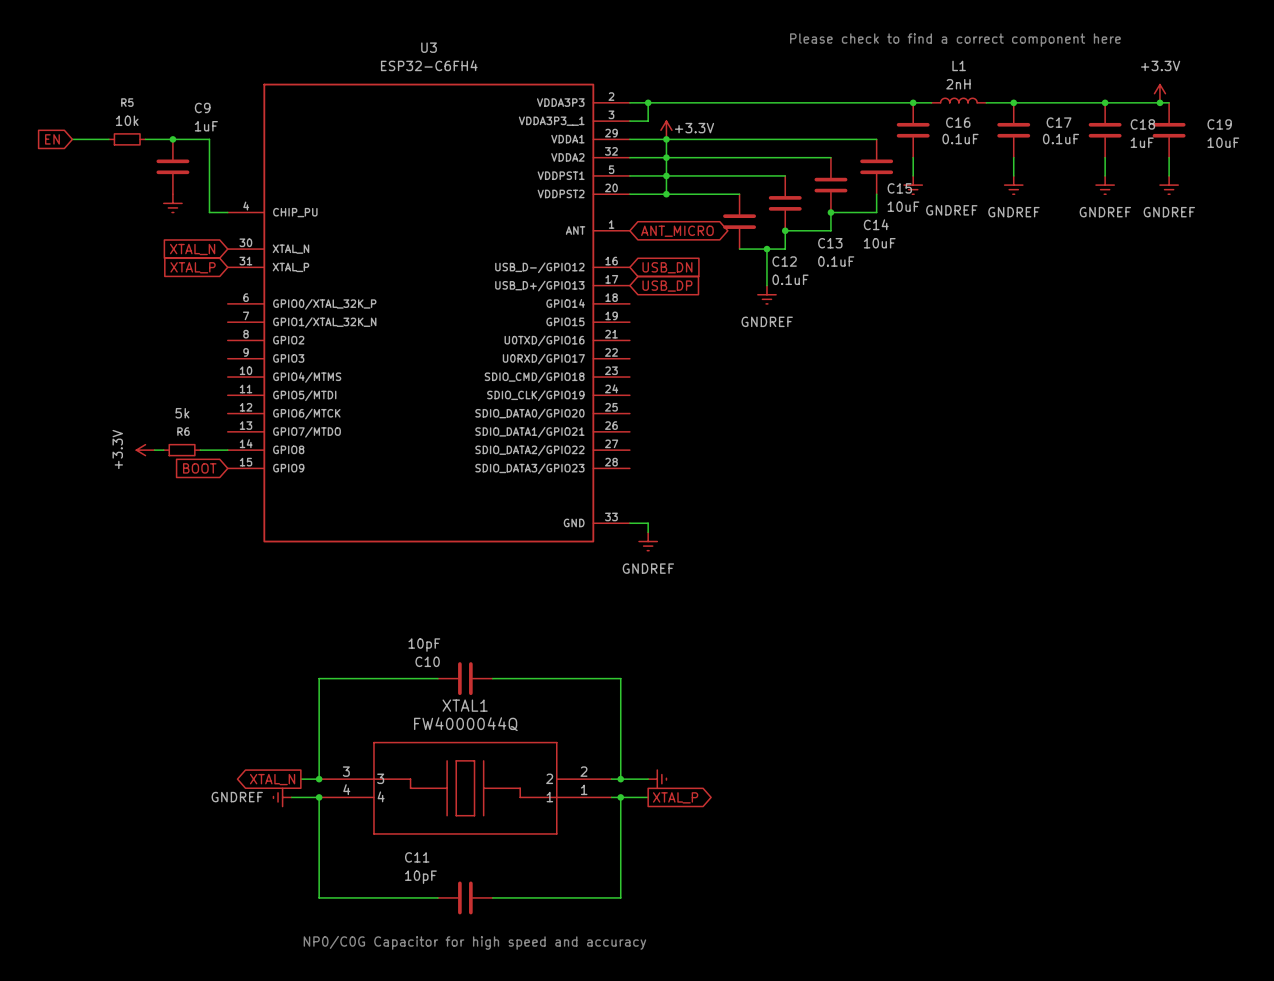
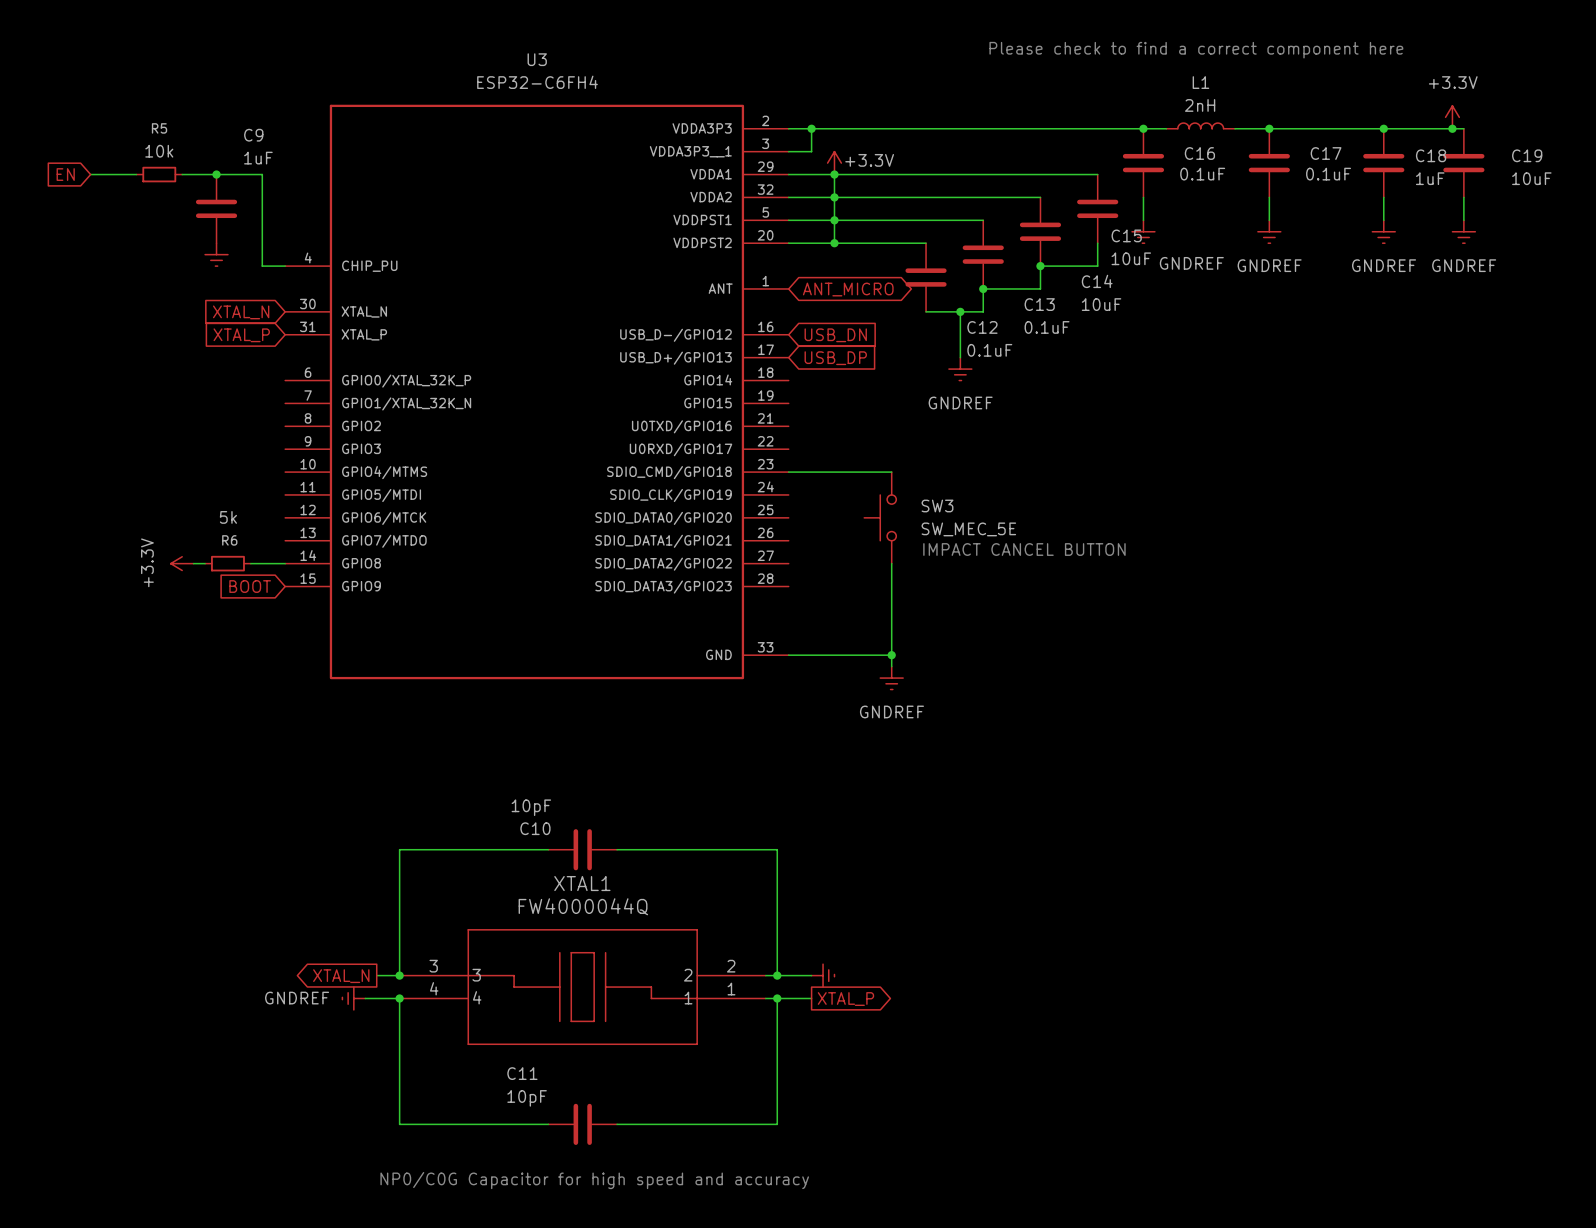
wire: none -> (788, 472) (891, 472)
SW3: none -> SW_MEC_5E (880, 517)
text: none -> IMPACT CANCEL BUTTON (1024, 549)
wire: none -> (891, 563) (891, 666)
wire: (648, 523) (648, 532) -> (811, 655) (891, 655)
junction: none -> (891, 655)
power symbol position: GNDREF (648, 541) -> GNDREF (891, 678)

